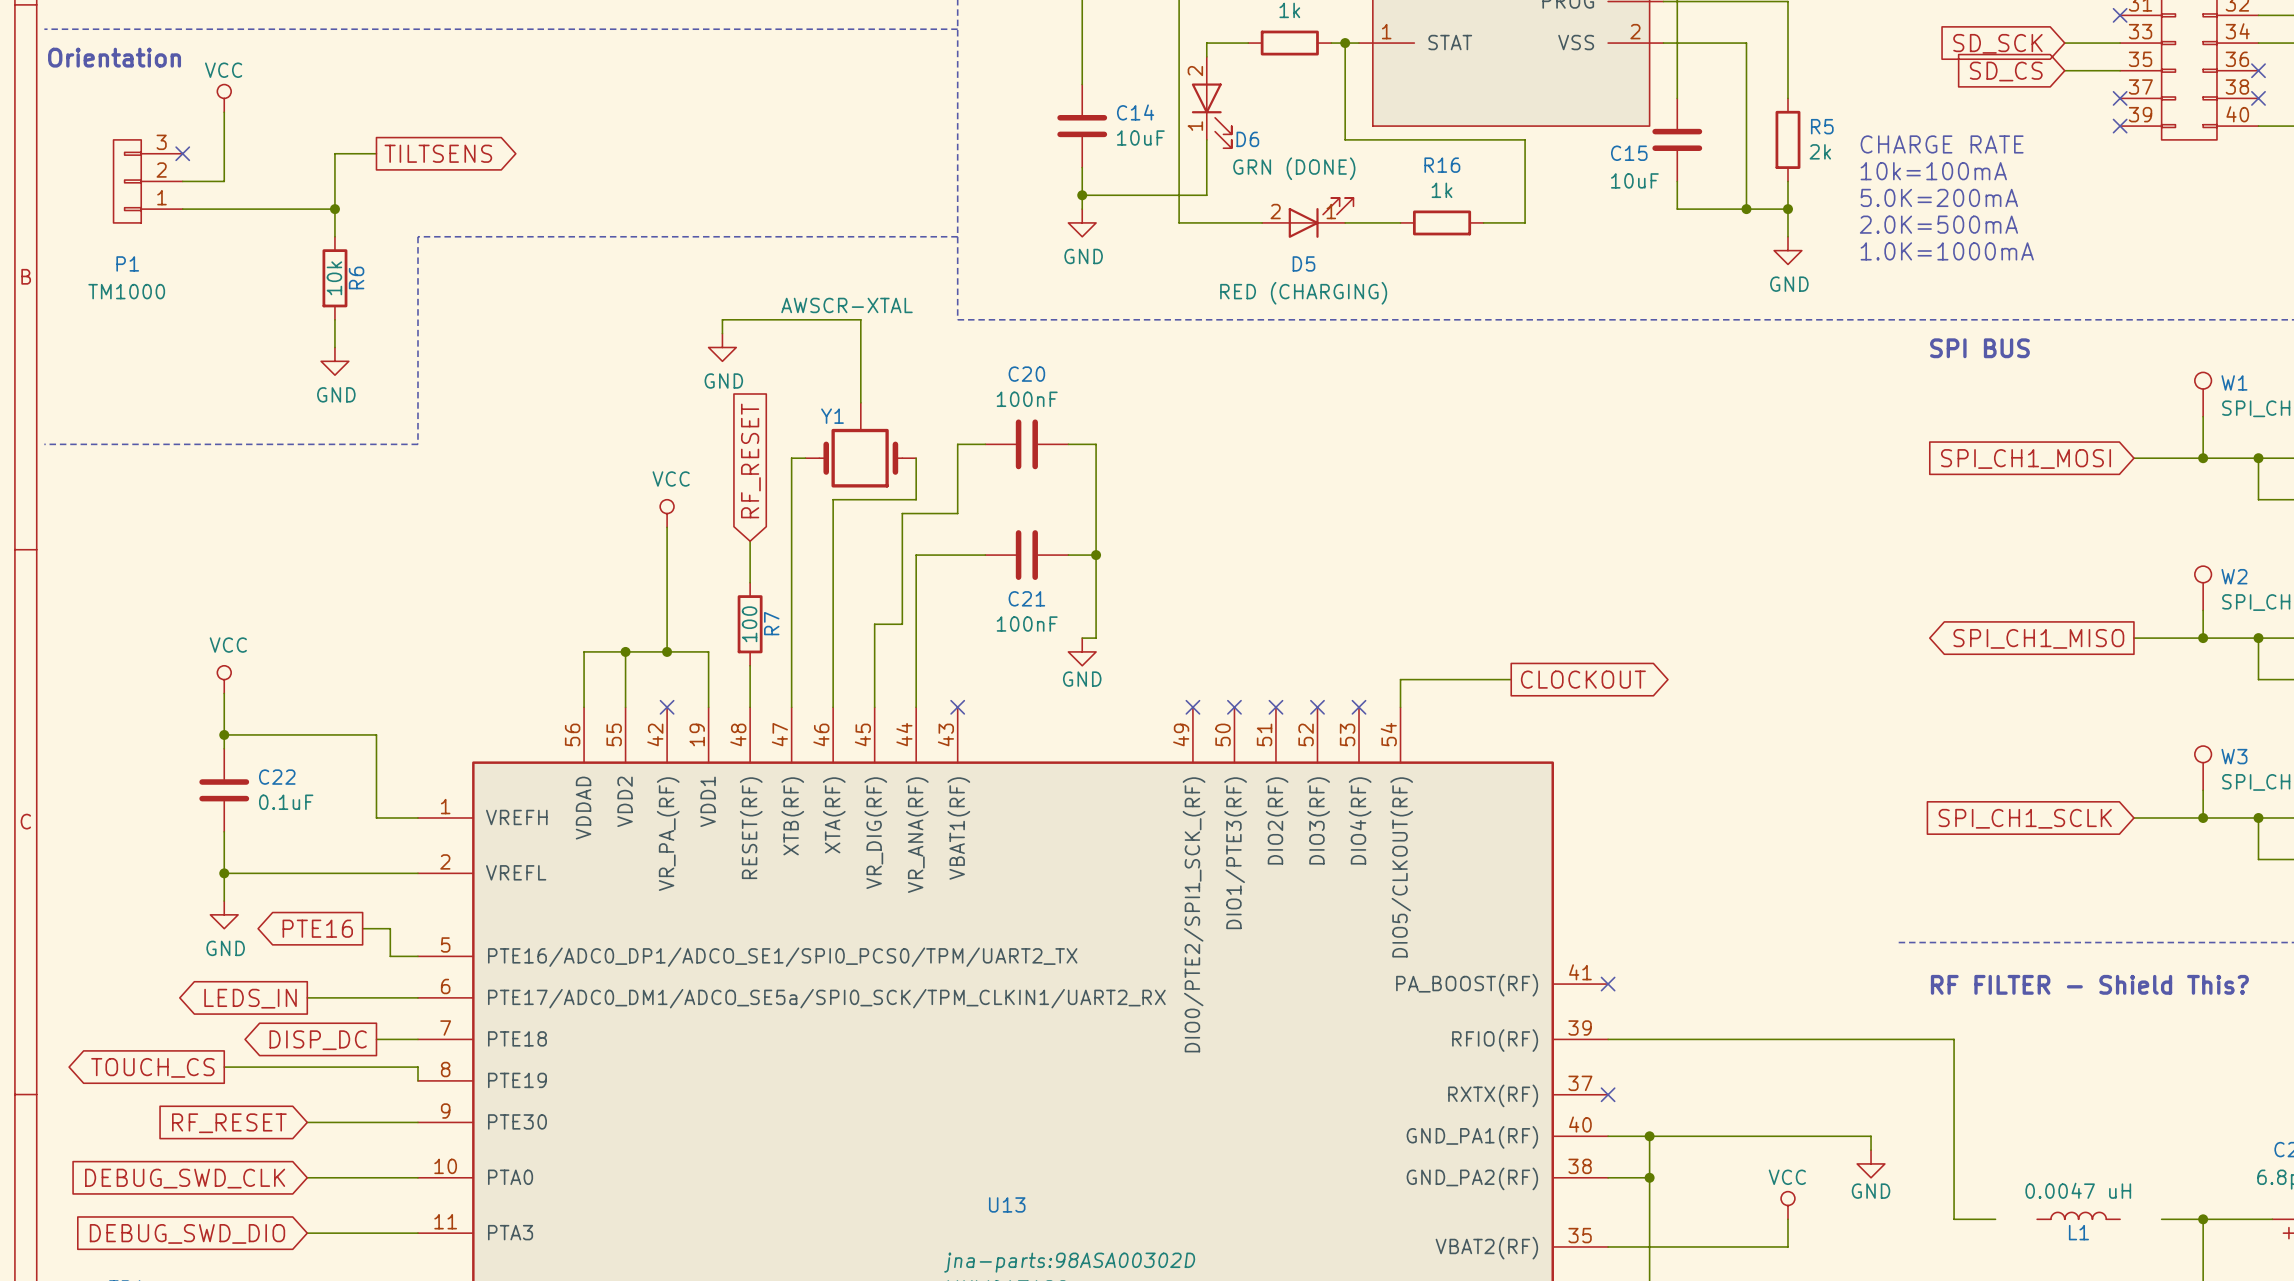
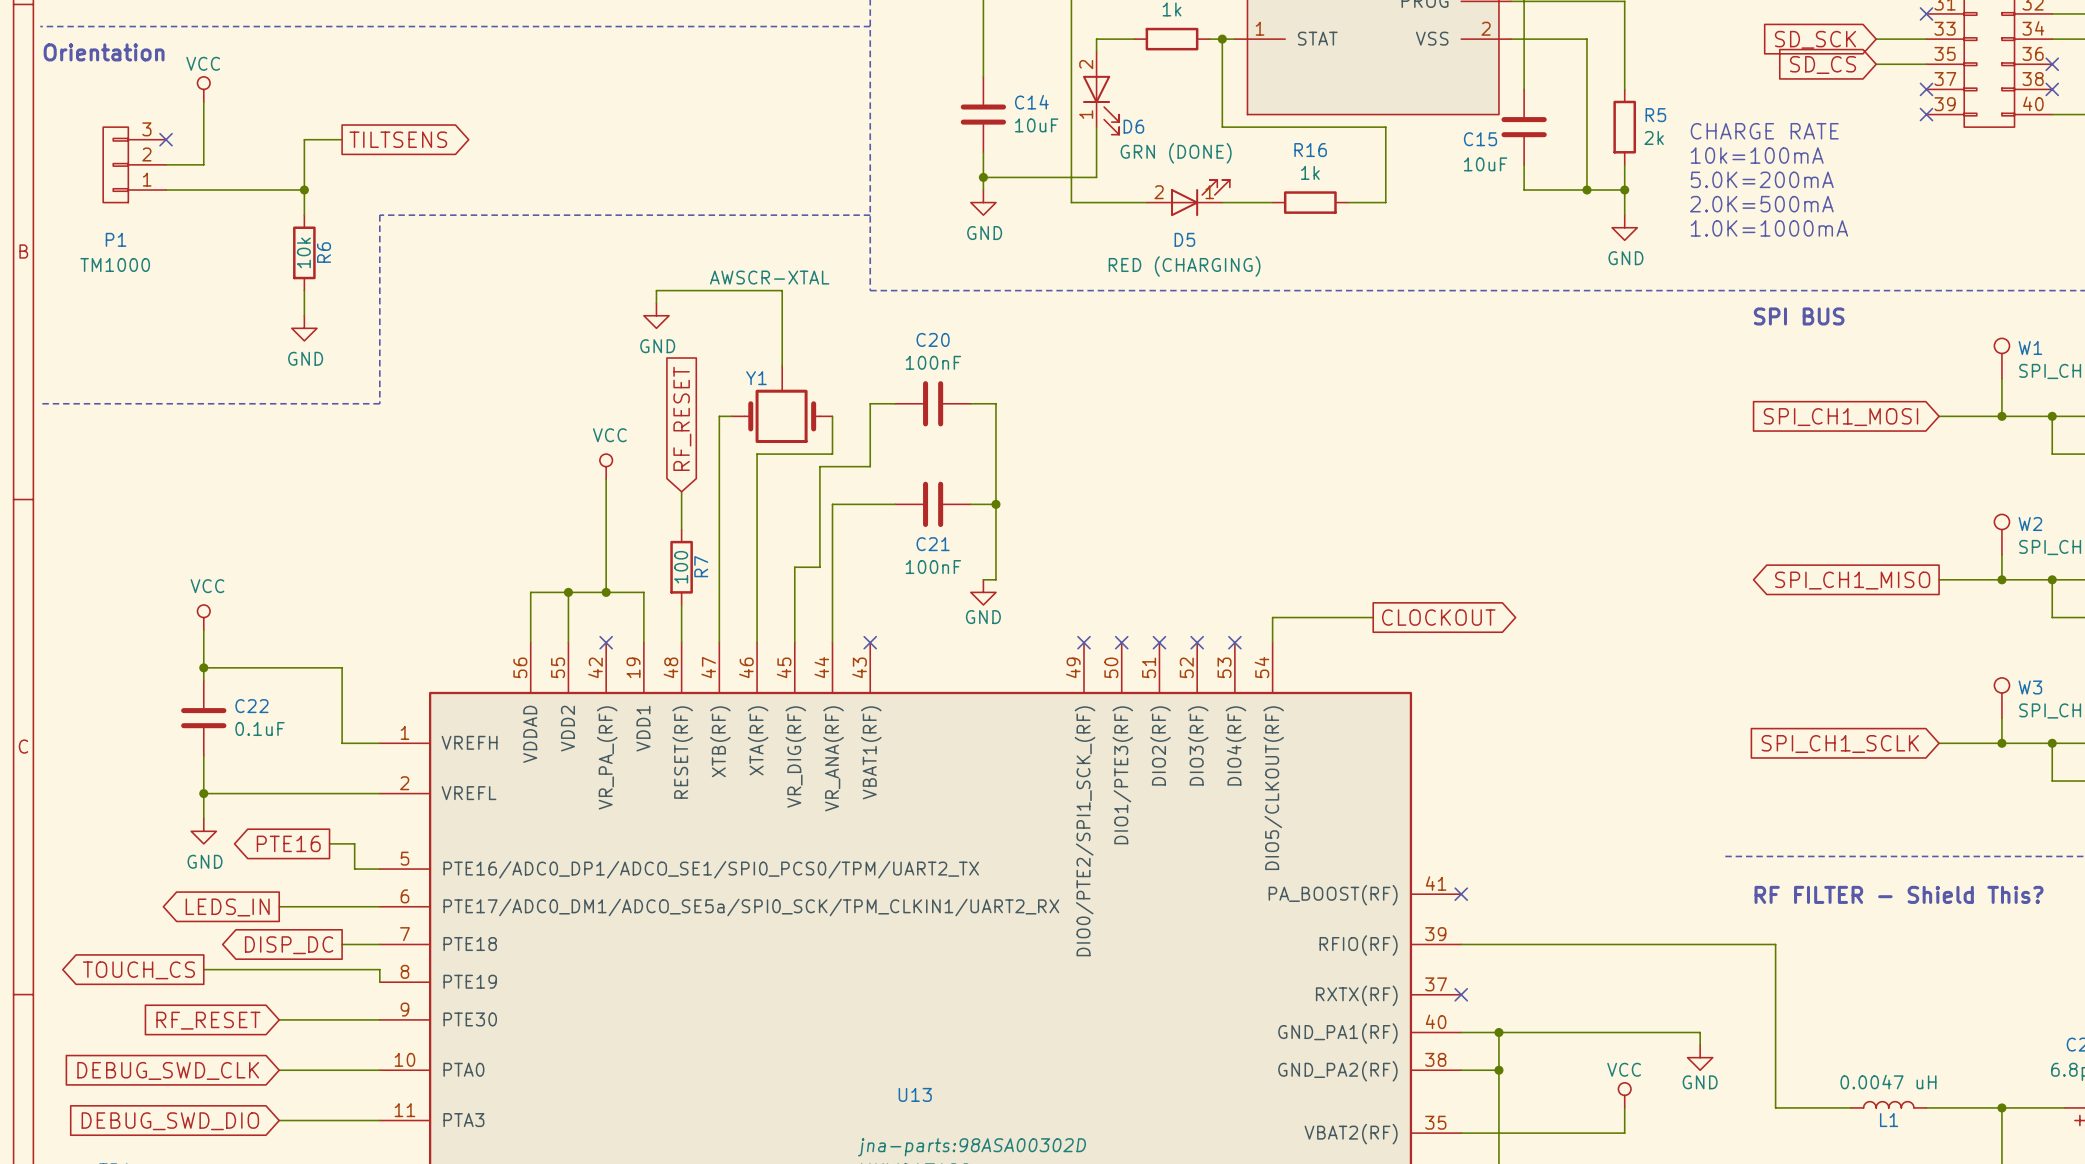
wire: none -> (1813, 1107) (1851, 1107)
wire: none -> (1926, 1107) (1964, 1107)

